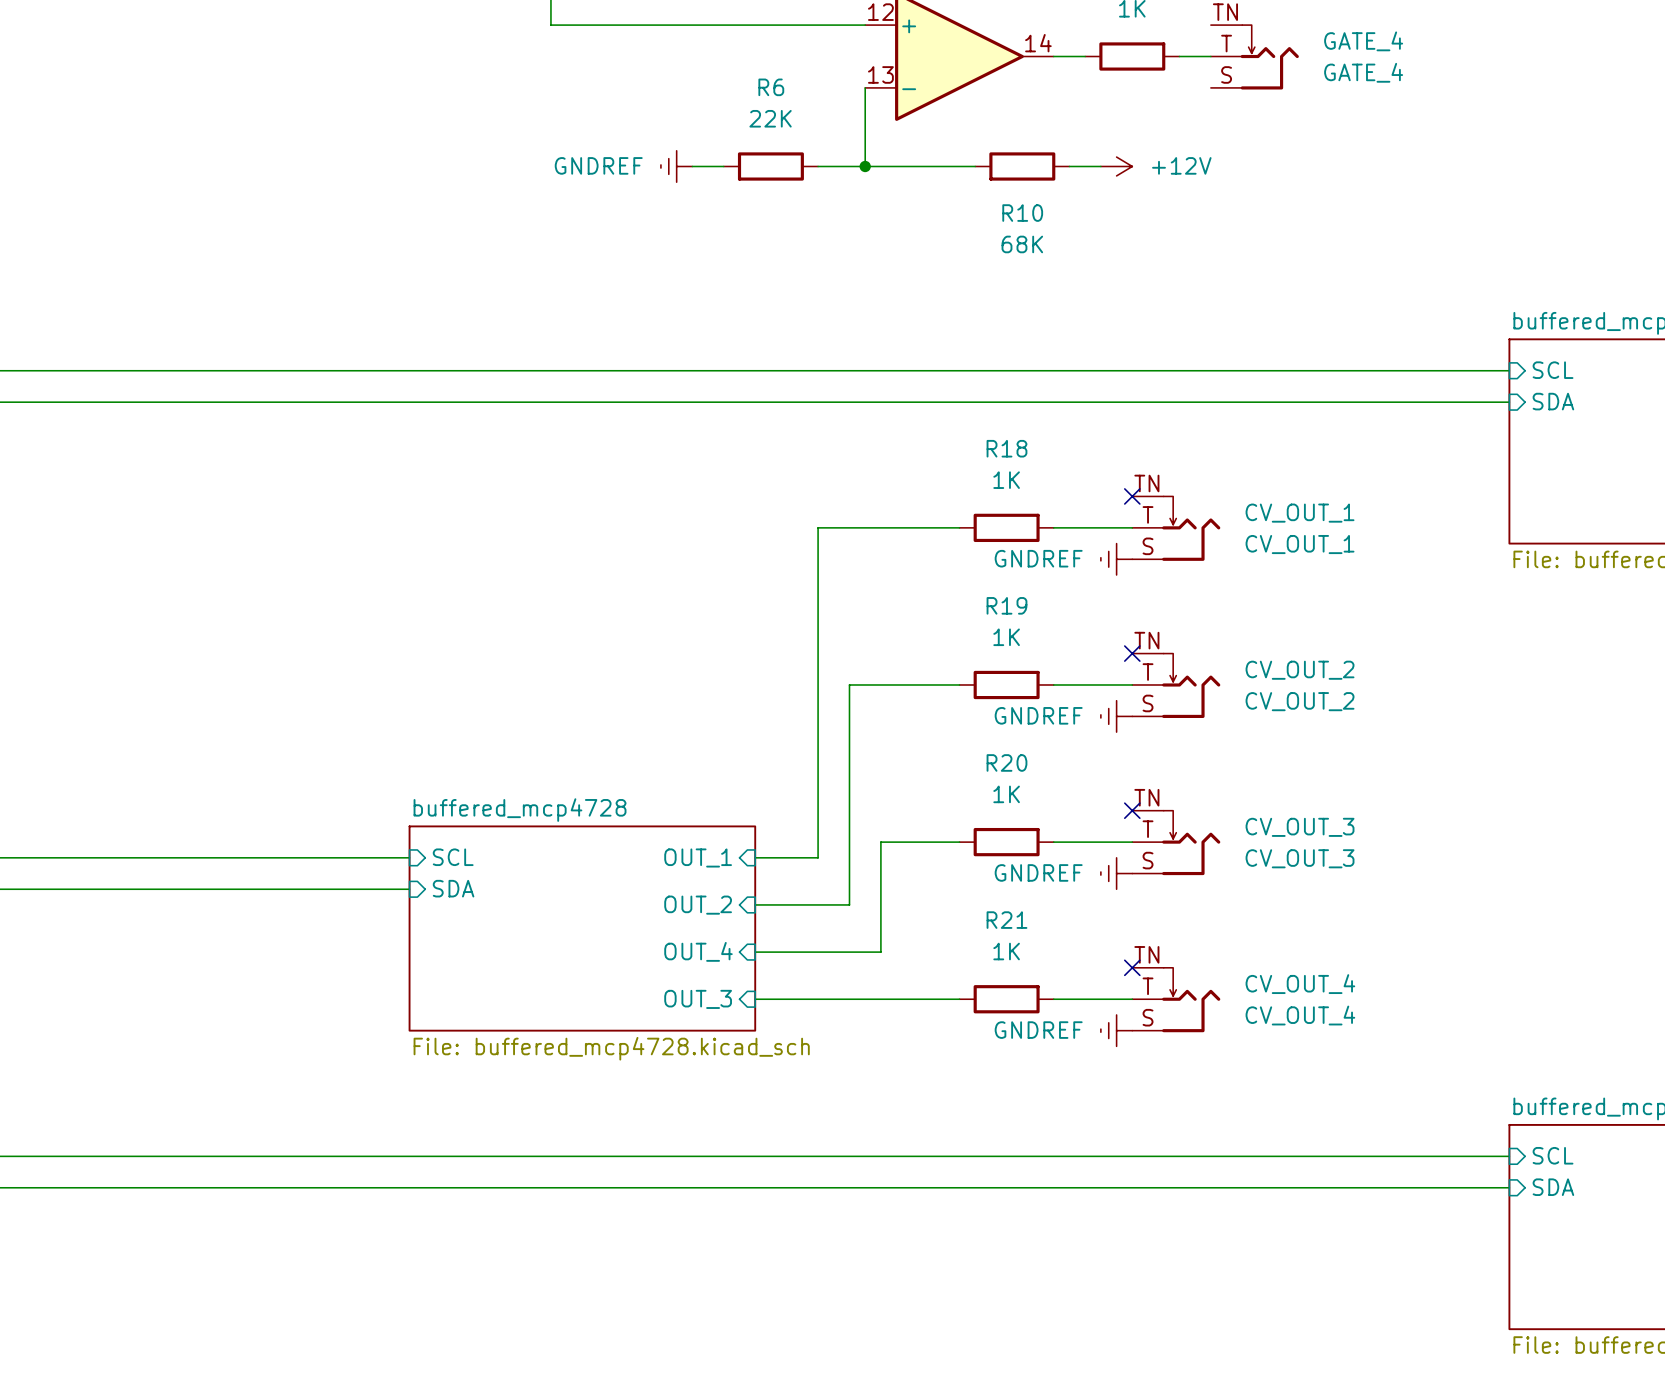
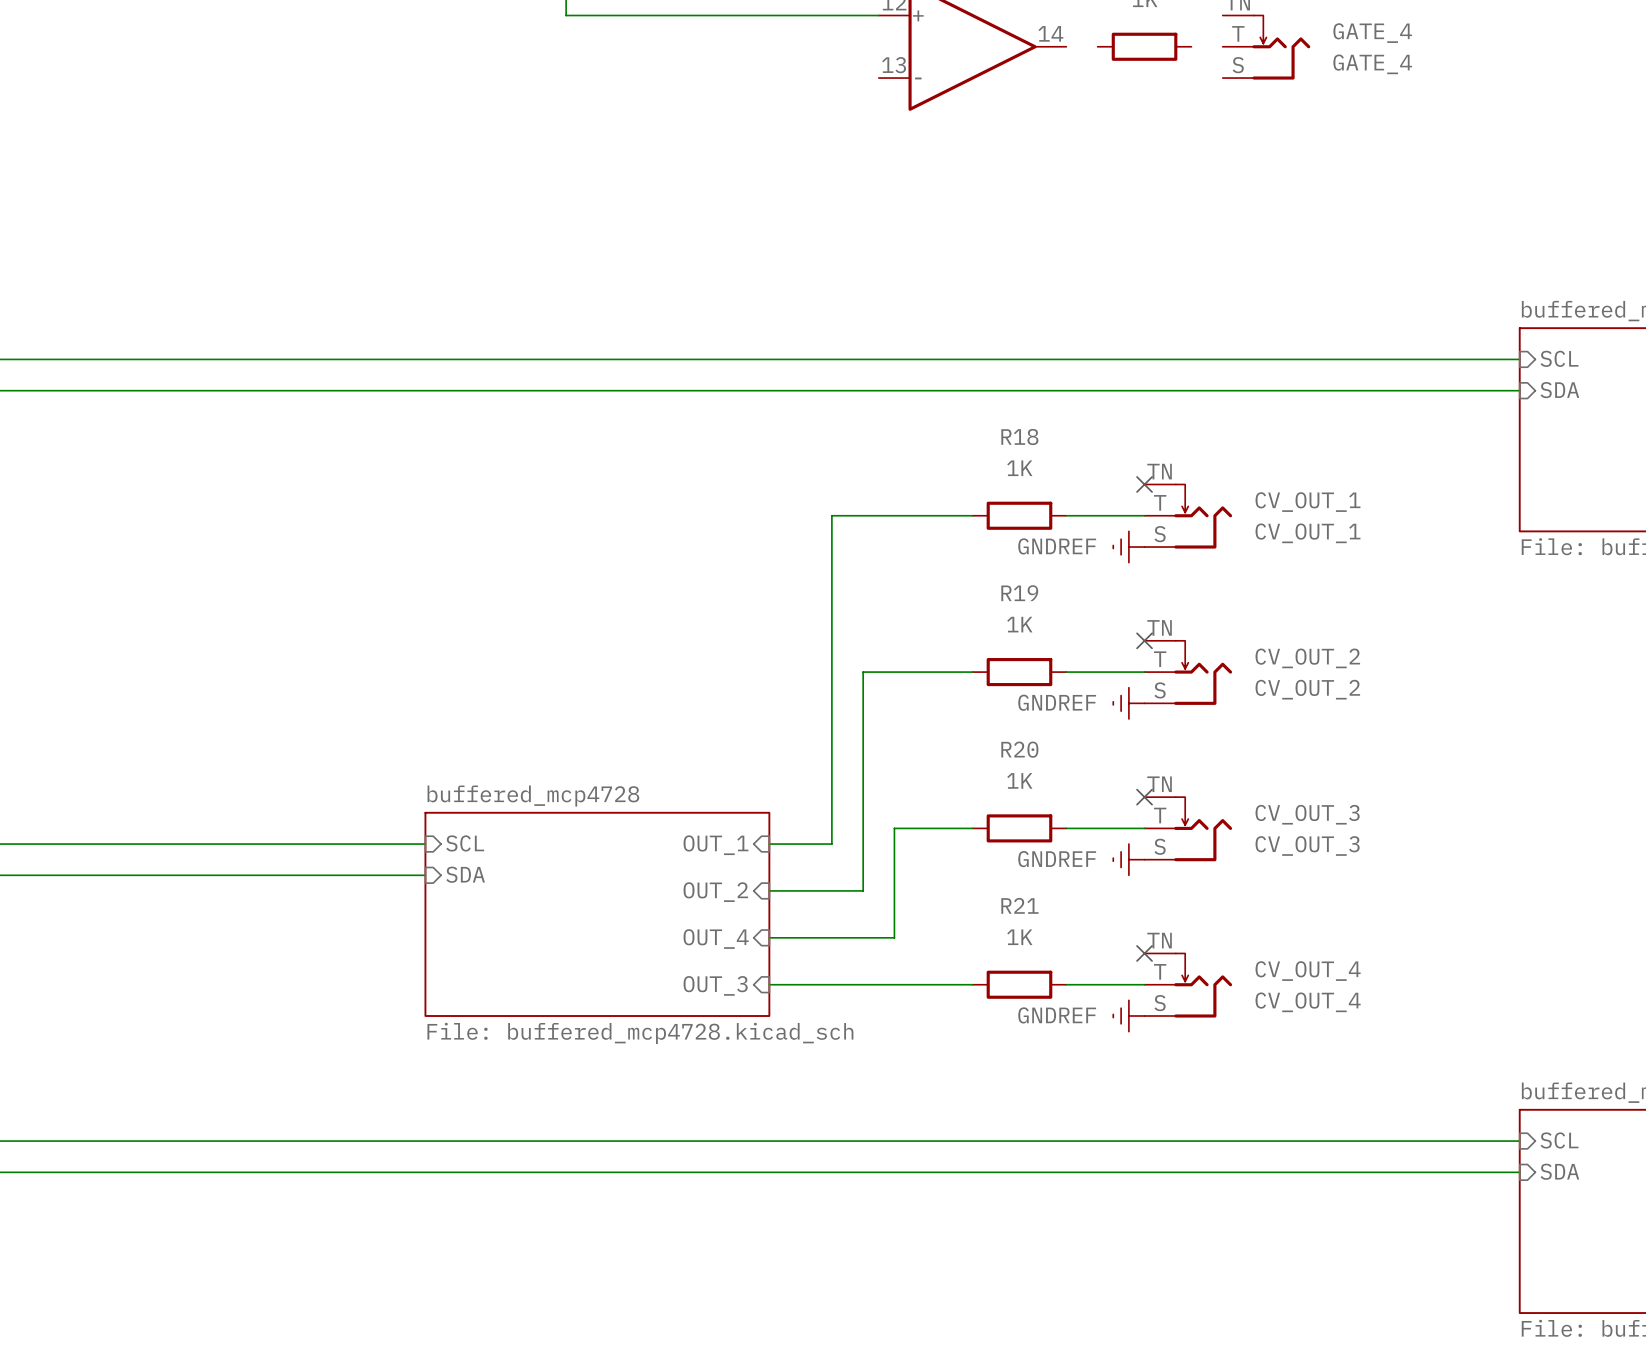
wire: (1053, 56) (1085, 56) -> none
wire: (1179, 56) (1210, 56) -> none
wire: (865, 87) (865, 166) -> none
power symbol: GNDREF (676, 166) -> none
wire: (692, 166) (723, 166) -> none
R6: 22K (770, 166) -> none
wire: (818, 166) (975, 166) -> none
junction: (865, 166) -> none
R10: 68K (1022, 166) -> none
wire: (1069, 166) (1100, 166) -> none
power symbol: +12V (1116, 166) -> none

